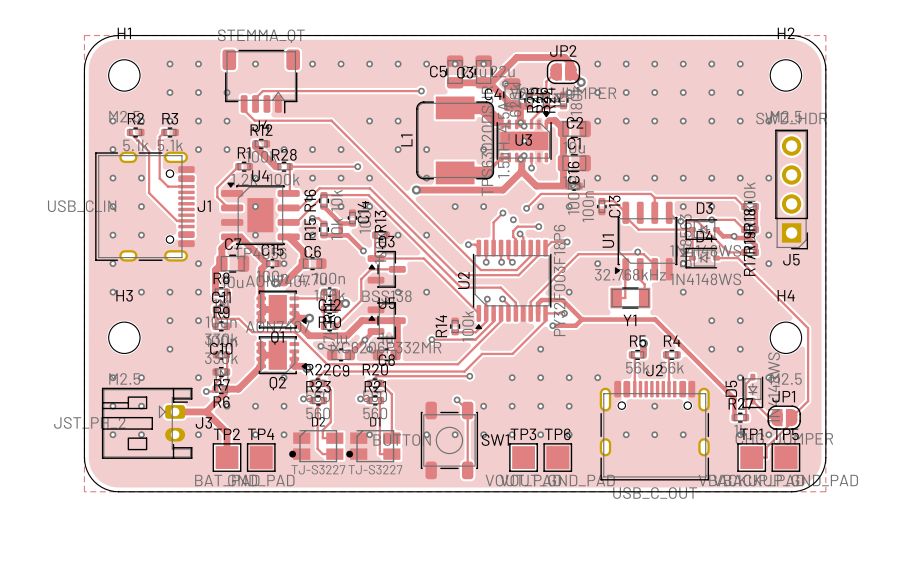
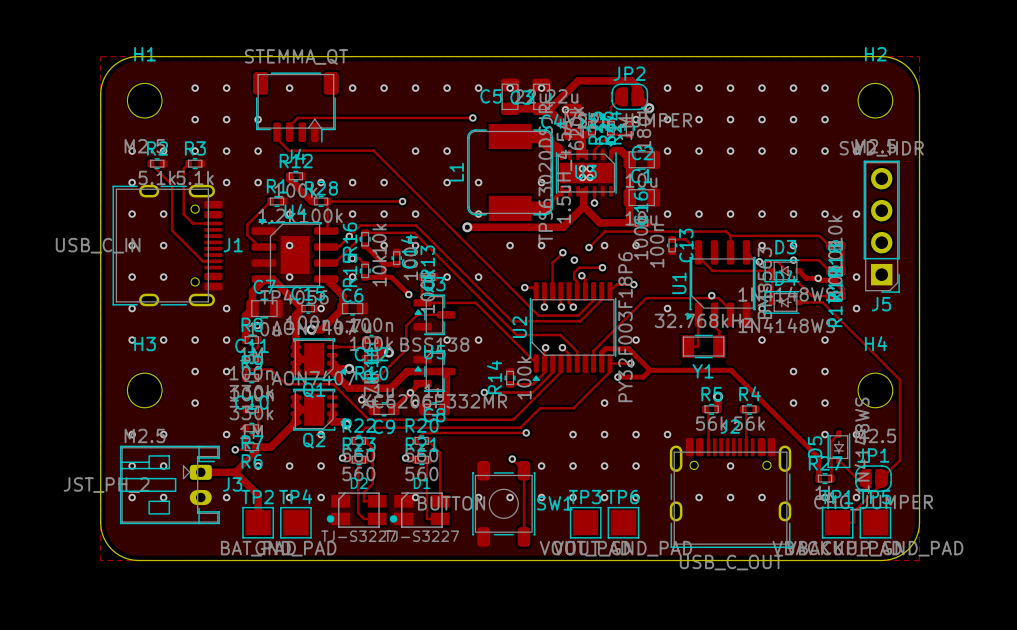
via: (520, 122) -> none
via: (524, 126) -> none
via: none -> (582, 168)
via: none -> (590, 168)
via: (524, 140) -> none
via: none -> (582, 177)
via: none -> (590, 177)
via: (524, 155) -> none
via: (520, 159) -> none

